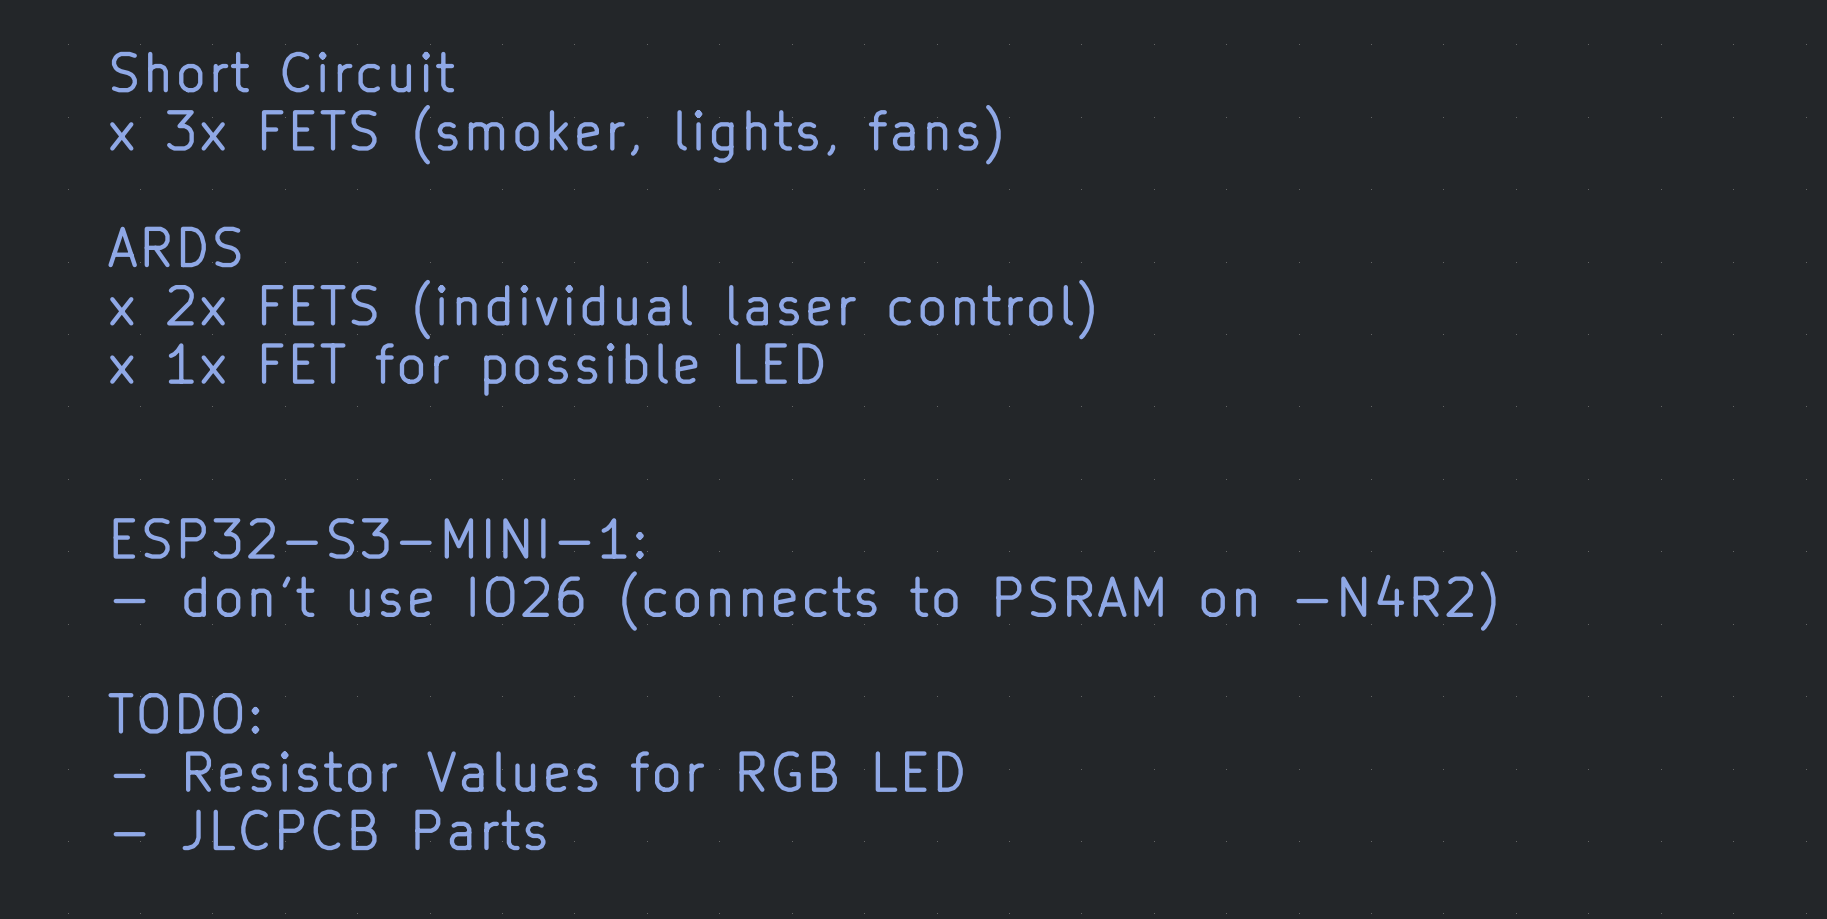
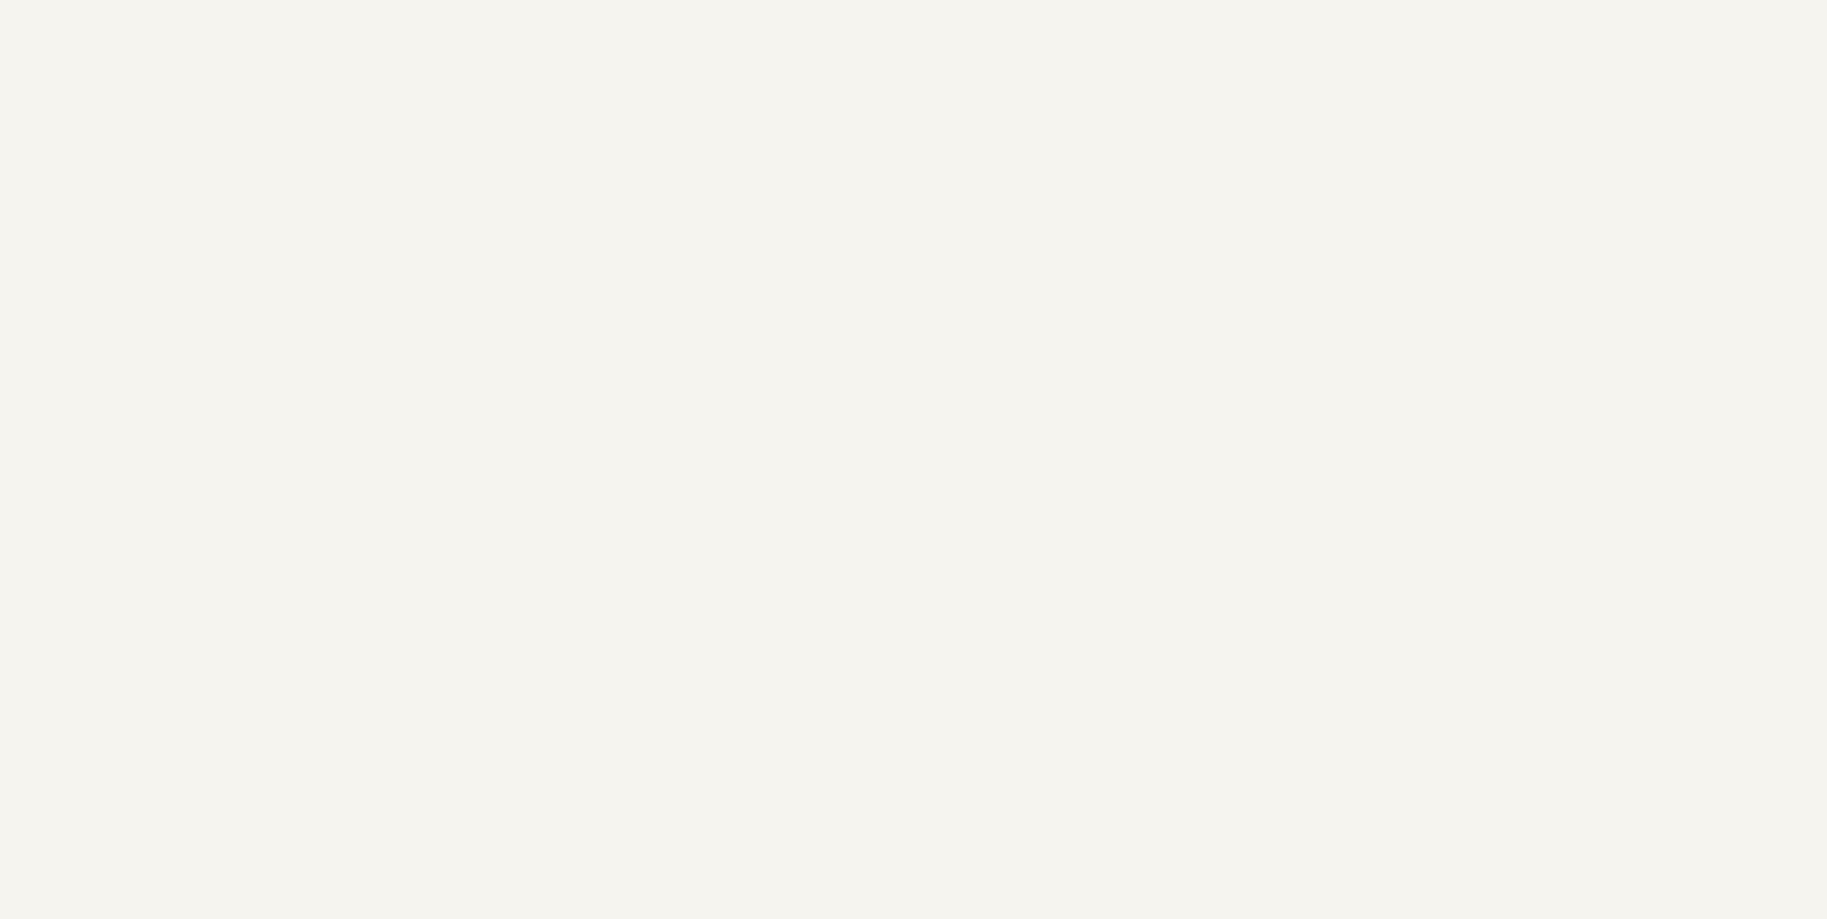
text: Short Circuit (283, 72) -> none
text: x 3x FETS (smoker, lights, fans) (555, 134) -> none
text: ARDS (174, 246) -> none
text: x 2x FETS (individual laser control) (601, 309) -> none
text: x 1x FET for possible LED (466, 369) -> none
text: ESP32-S3-MINI-1: (378, 538) -> none
text: - don't use IO26 (connects to PSRAM on -N4R2) (804, 601) -> none
text: TODO: (183, 713) -> none
text: - Resistor Values for RGB LED (538, 771) -> none
text: - JLCPCB Parts (329, 829) -> none

